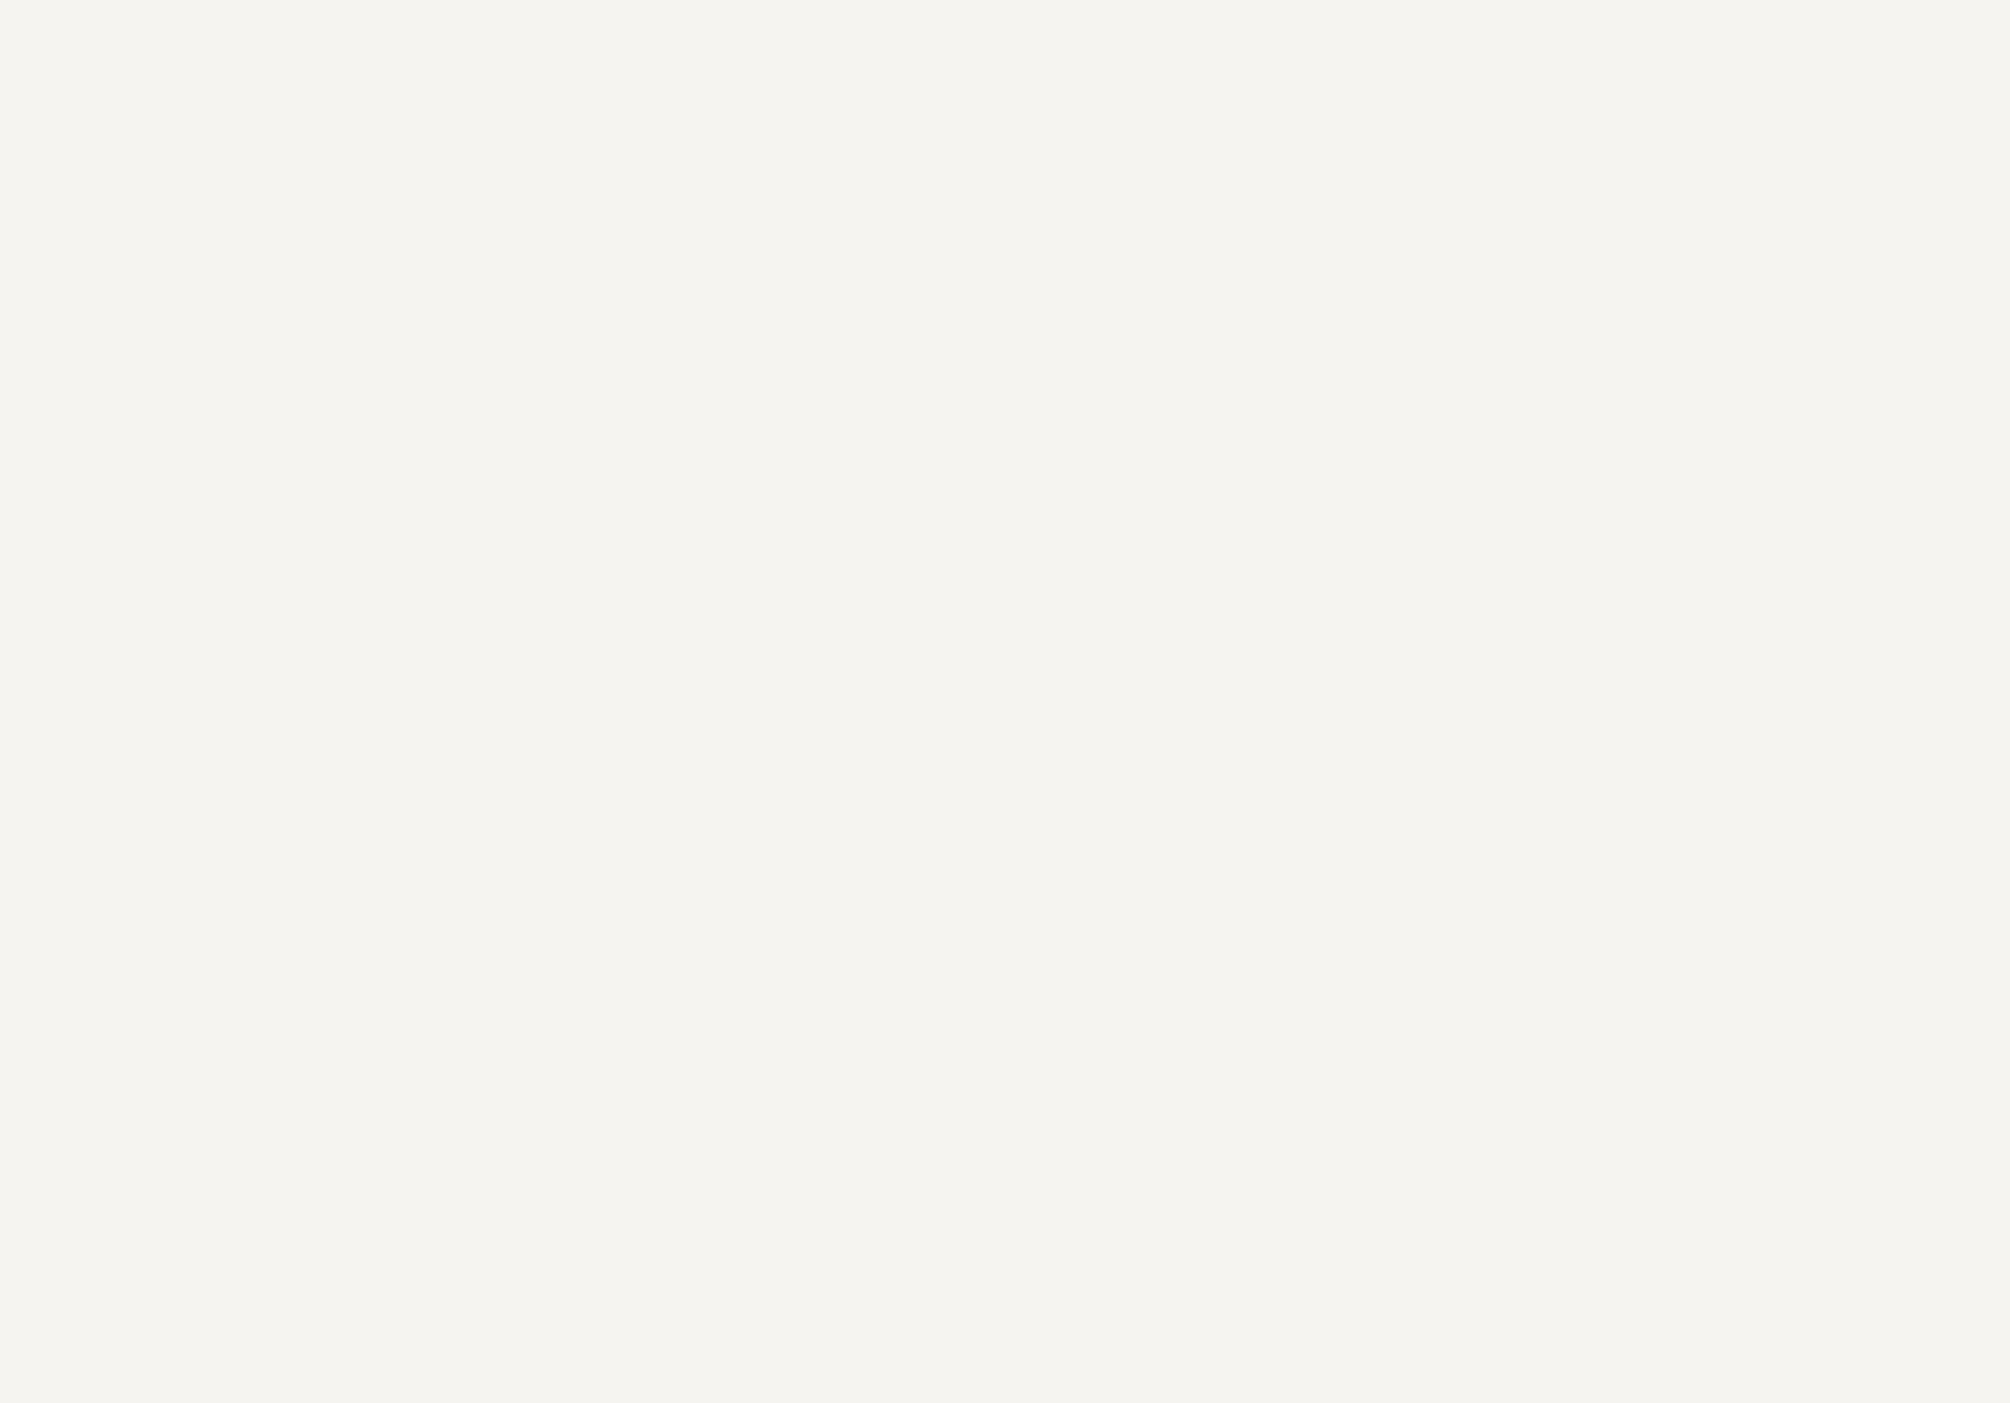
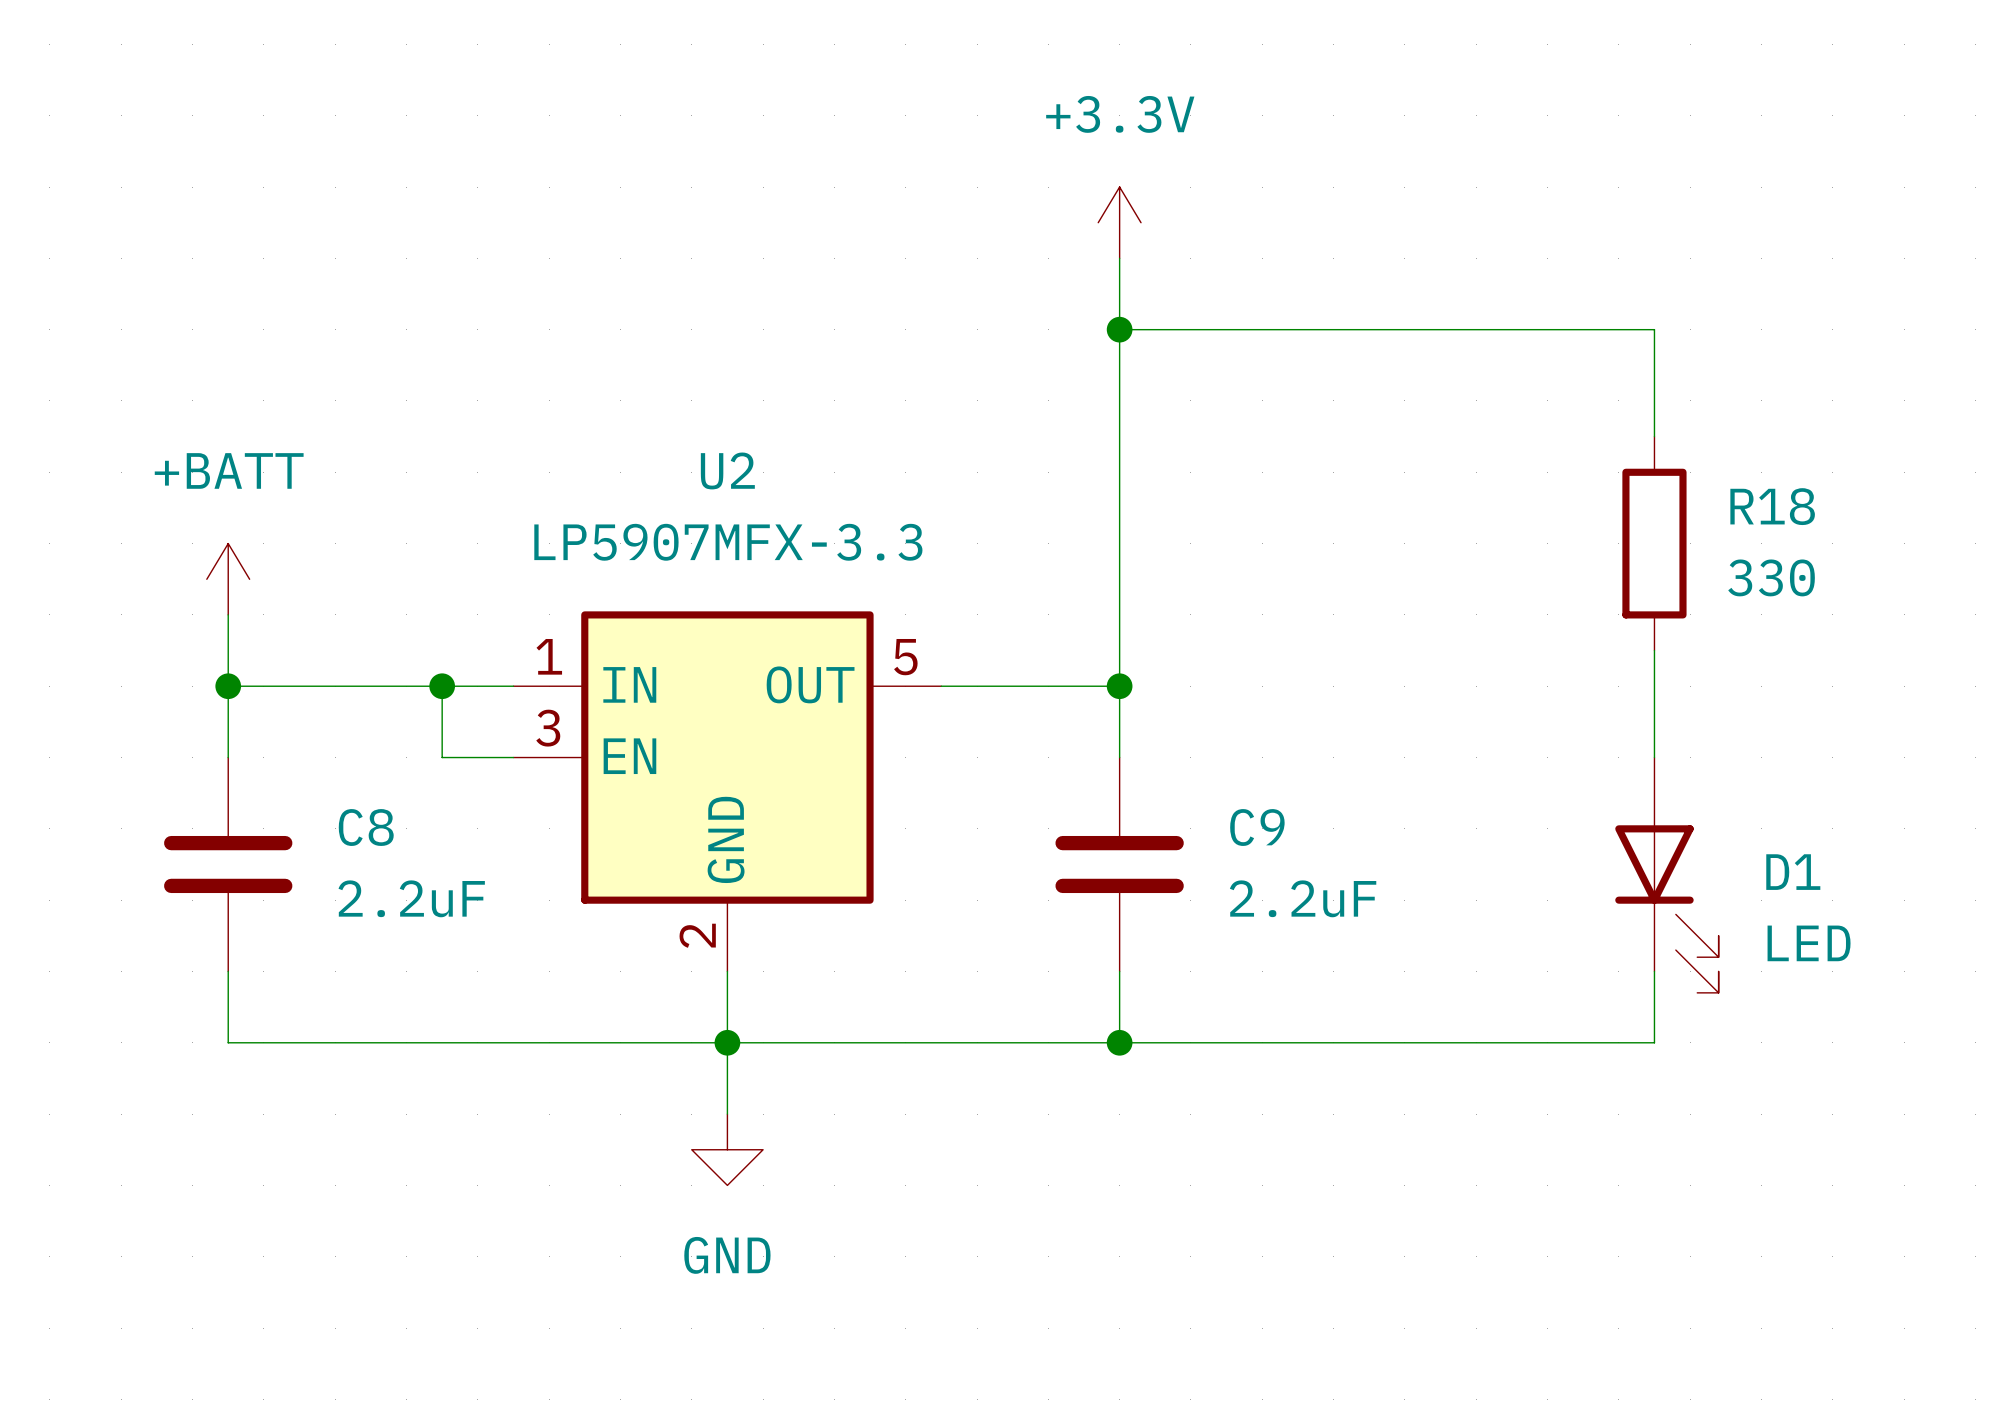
power symbol: none -> +3.3V (1119, 222)
wire: none -> (1119, 258) (1119, 757)
wire: none -> (1119, 329) (1654, 329) (1654, 436)
junction: none -> (1119, 329)
R18: none -> 330 (1654, 543)
power symbol: none -> +BATT (228, 579)
wire: none -> (228, 614) (228, 757)
wire: none -> (1654, 650) (1654, 757)
wire: none -> (228, 686) (513, 686)
junction: none -> (228, 686)
wire: none -> (442, 686) (442, 757) (513, 757)
junction: none -> (442, 686)
wire: none -> (941, 686) (1119, 686)
junction: none -> (1119, 686)
U2: none -> LP5907MFX-3.3 (727, 791)
C8: none -> 2.2uF (228, 864)
C9: none -> 2.2uF (1119, 864)
D1: none -> LED (1666, 875)
wire: none -> (228, 971) (228, 1042) (1654, 1042) (1654, 971)
wire: none -> (727, 971) (727, 1114)
wire: none -> (1119, 971) (1119, 1042)
junction: none -> (727, 1042)
junction: none -> (1119, 1042)
power symbol: none -> GND (727, 1149)

